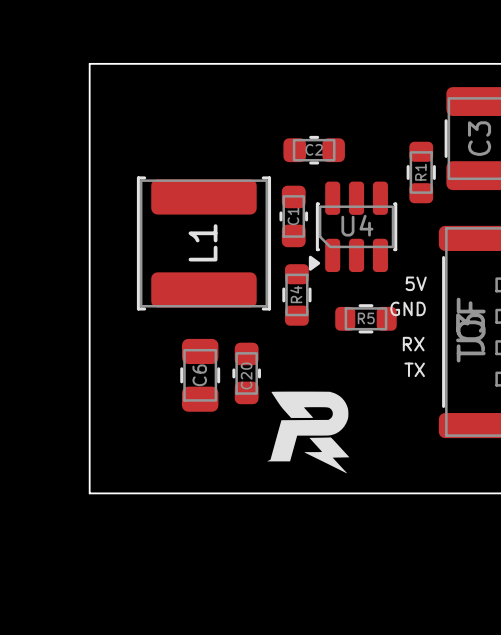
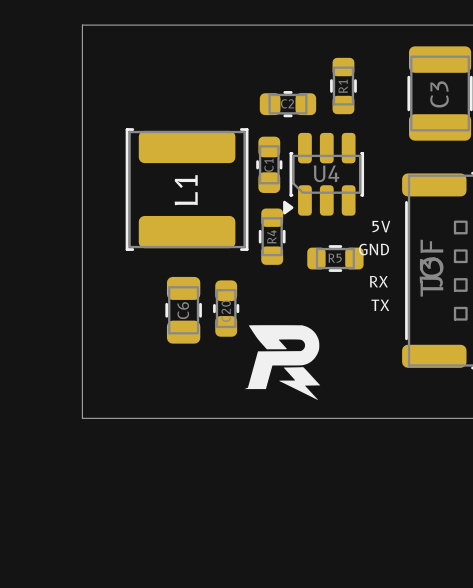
R1 position: (421, 172) -> (343, 86)

